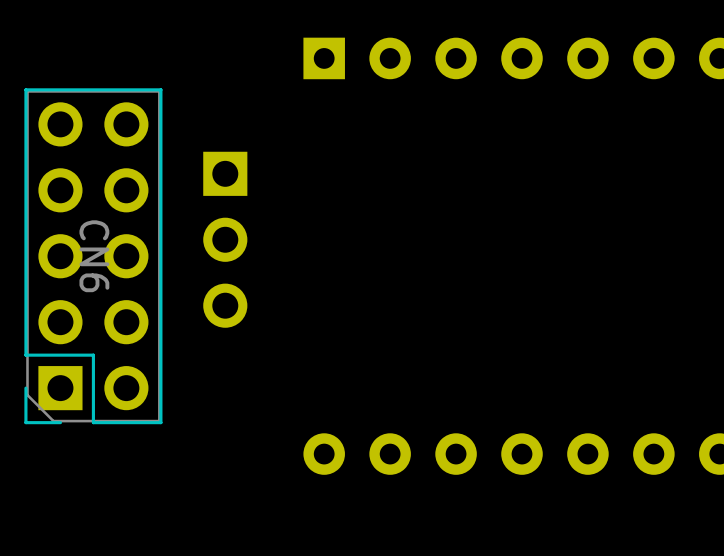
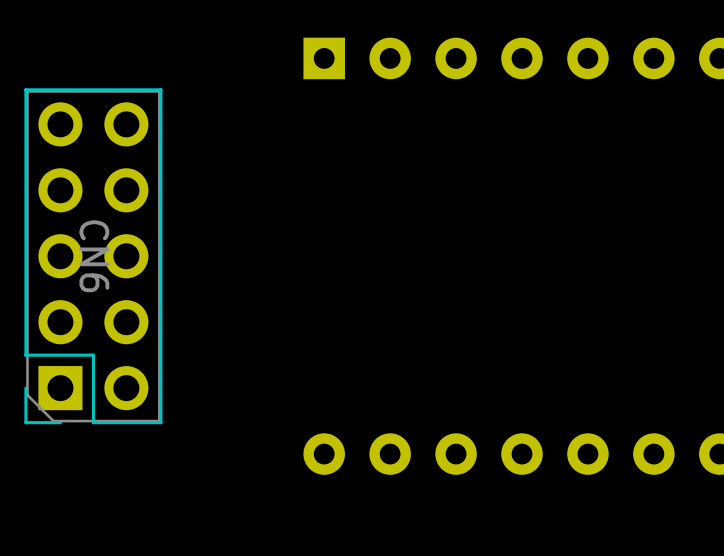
part: (225, 239) -> none

